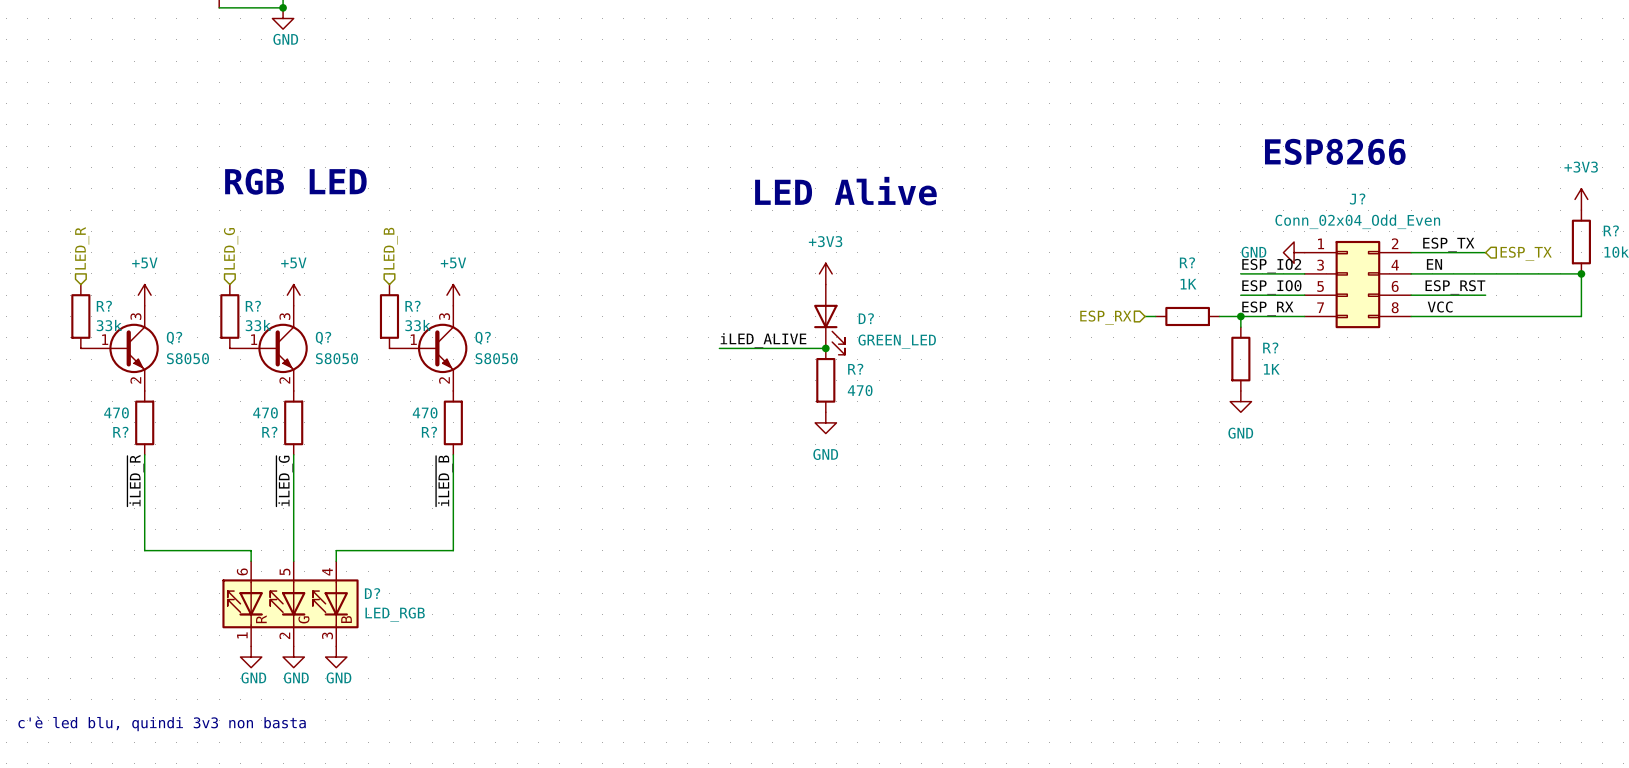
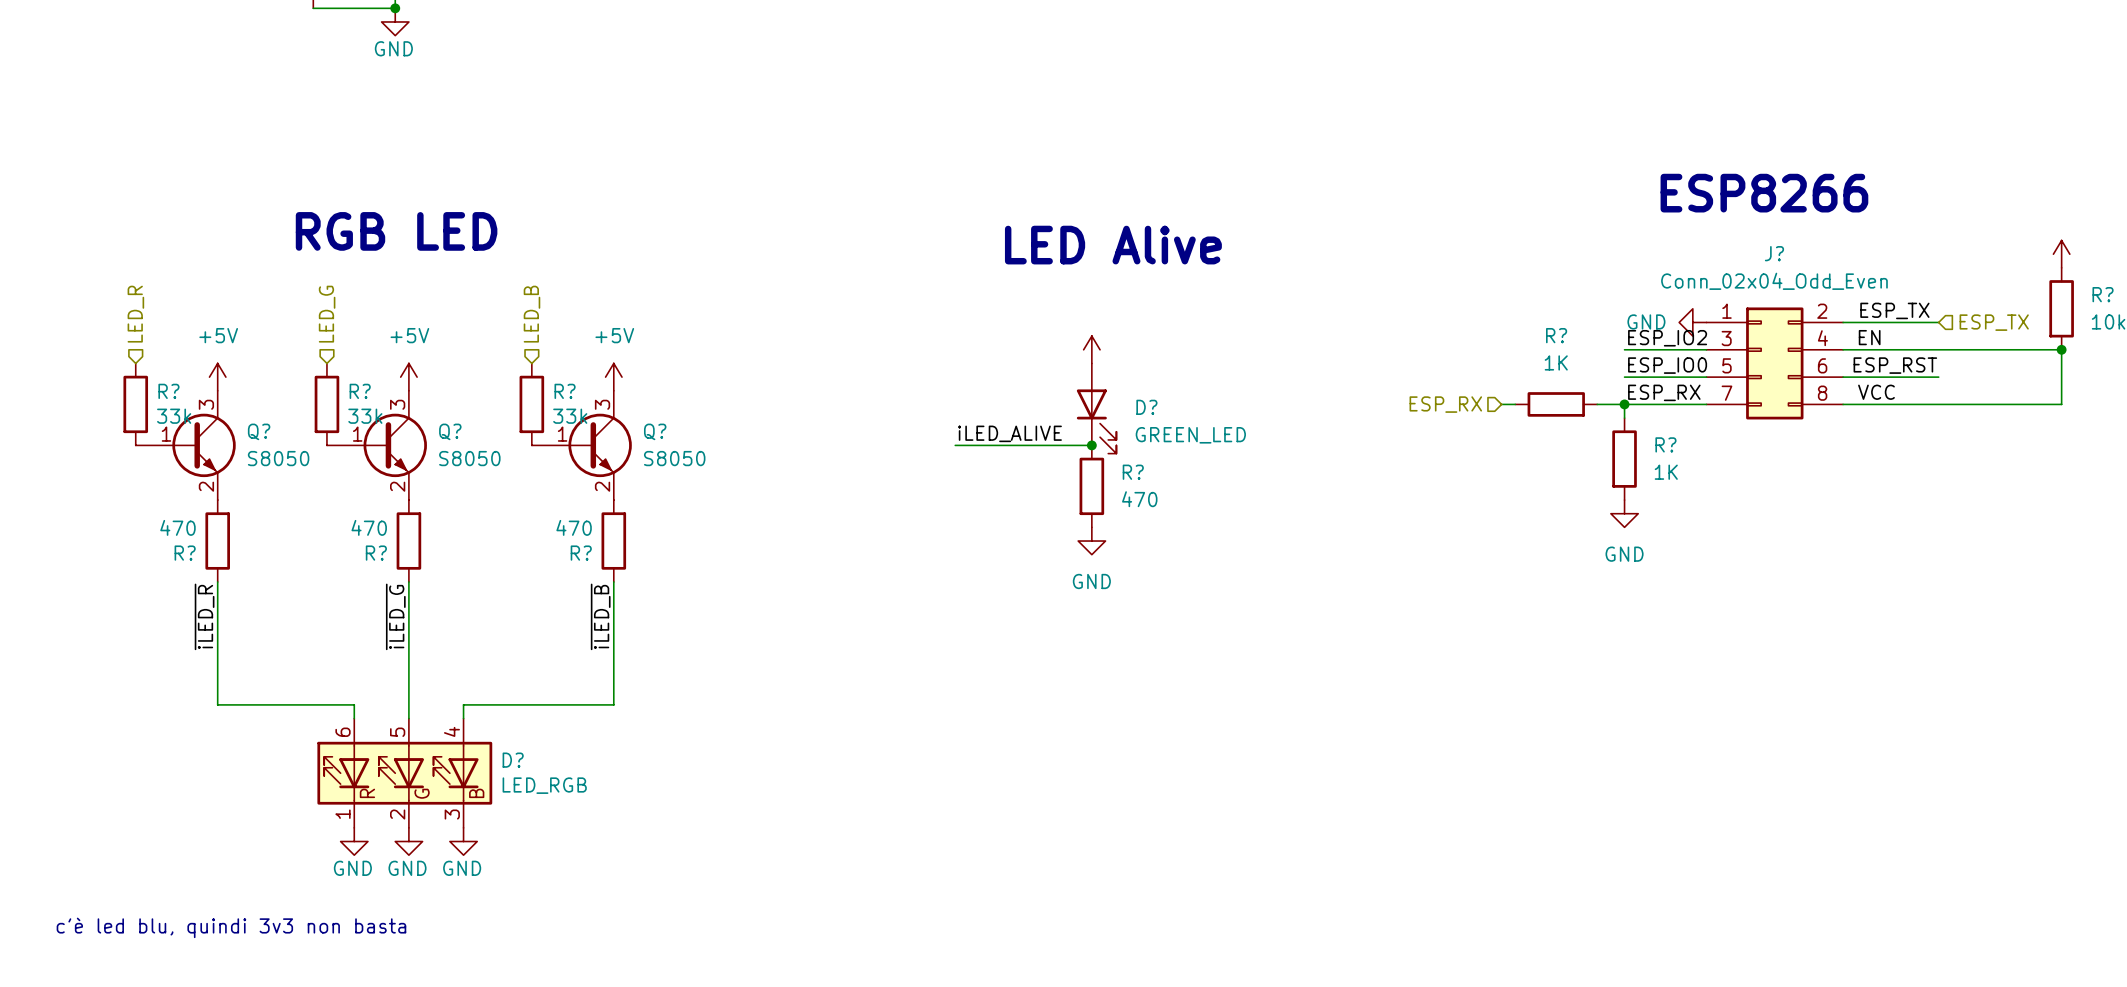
power symbol text: +3V3 (1581, 167) -> none
power symbol text: +3V3 (825, 241) -> none

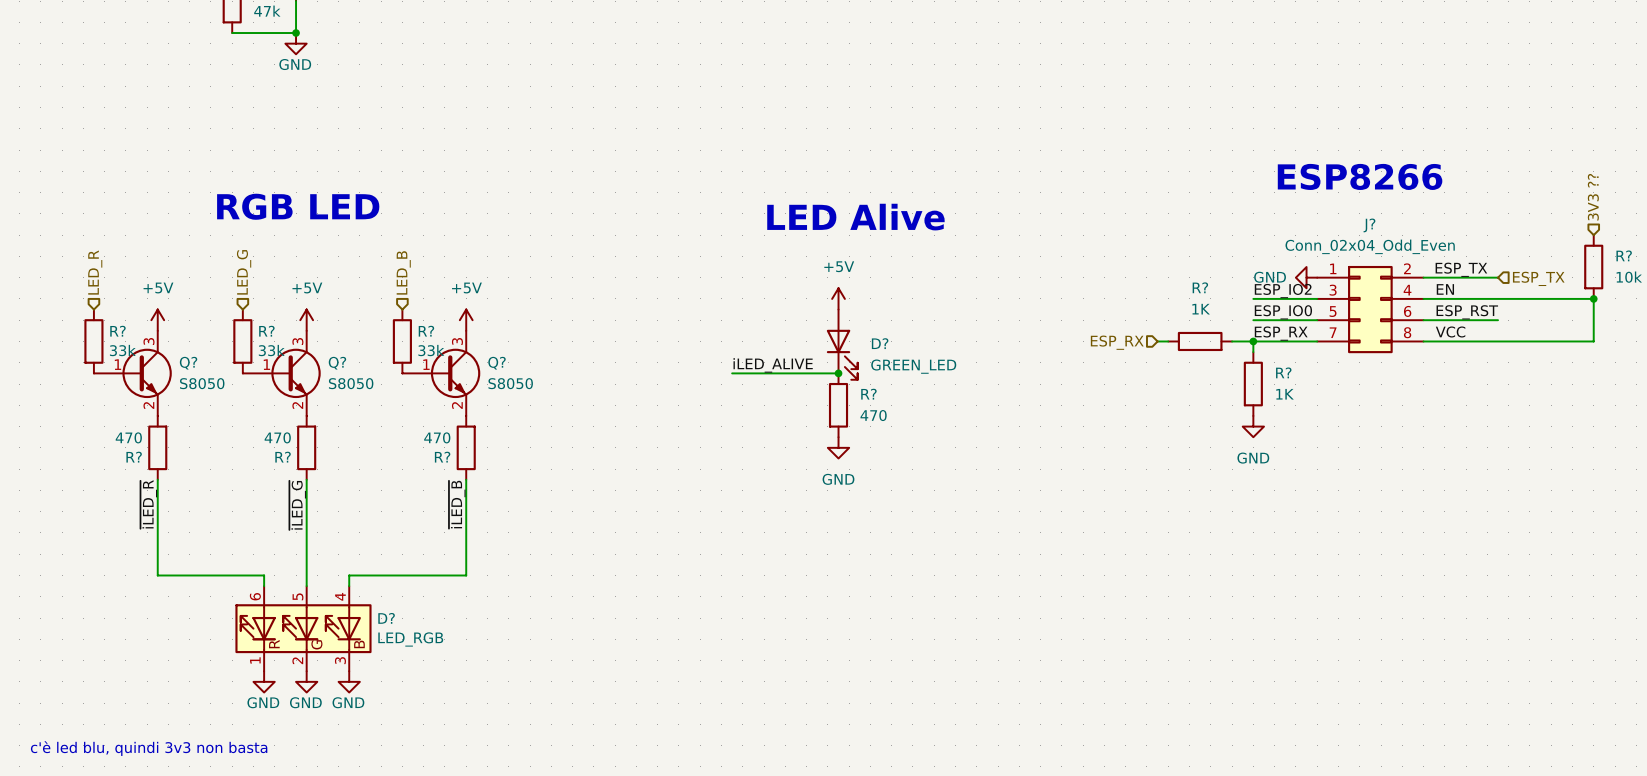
hierarchical label: none -> 3V3 ?? (1593, 197)
power symbol: (2061, 254) -> none
power symbol text: none -> +5V (839, 266)

